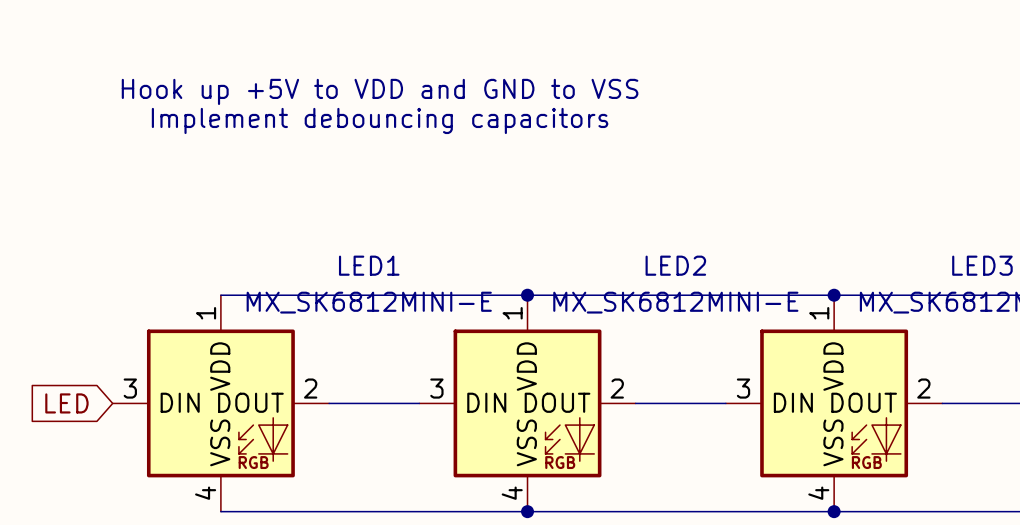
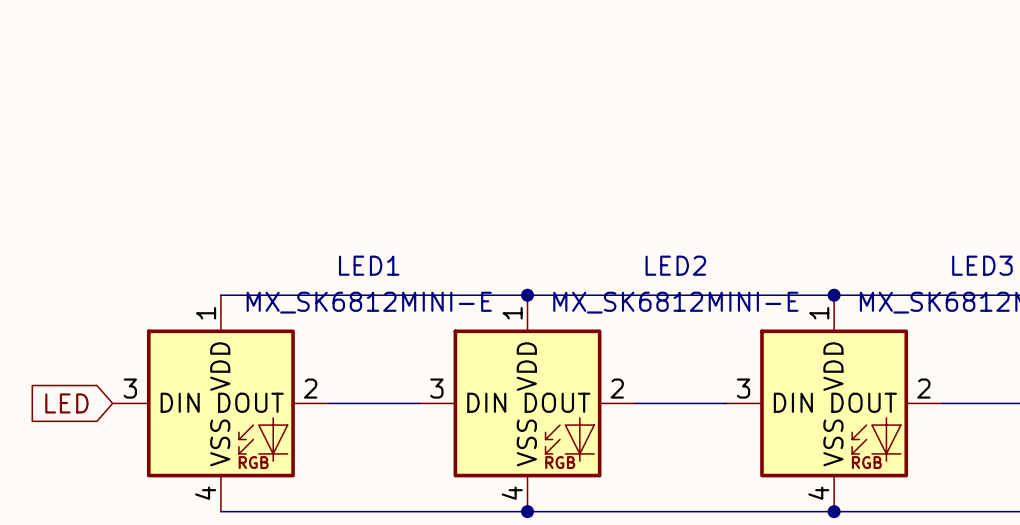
text: Hook up +5V to VDD and GND to VSS (380, 91) -> none
text: Implement debouncing capacitors (380, 120) -> none

